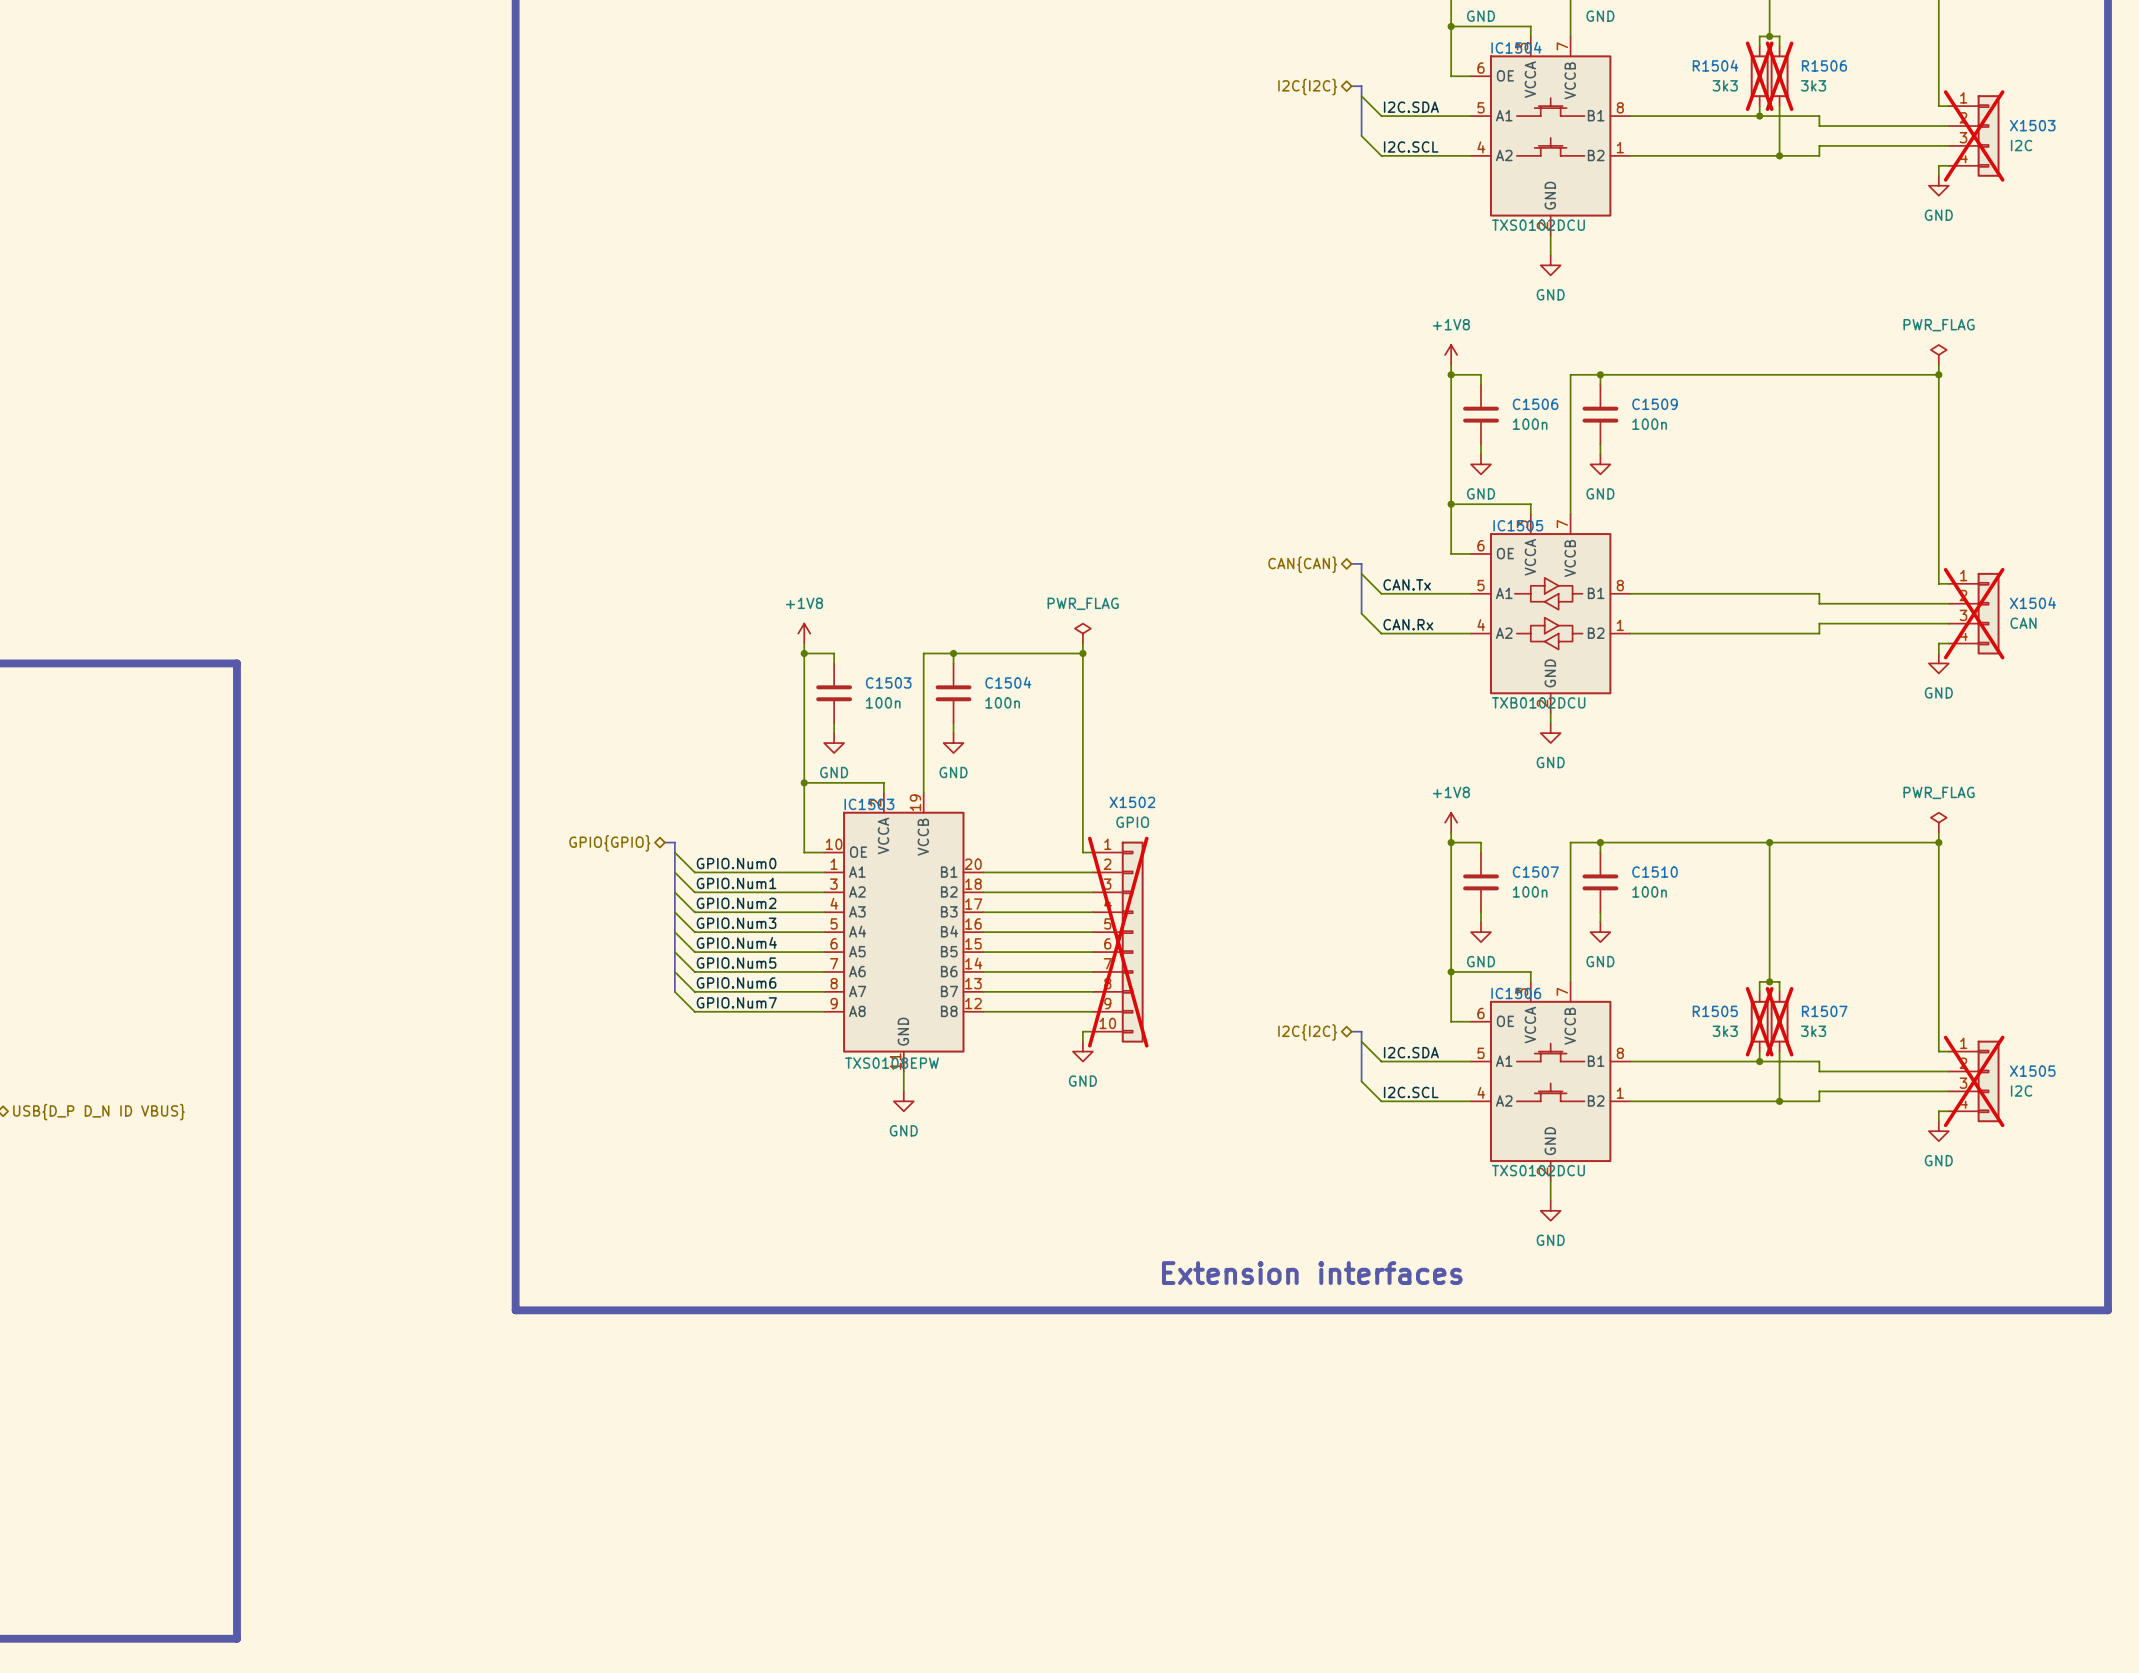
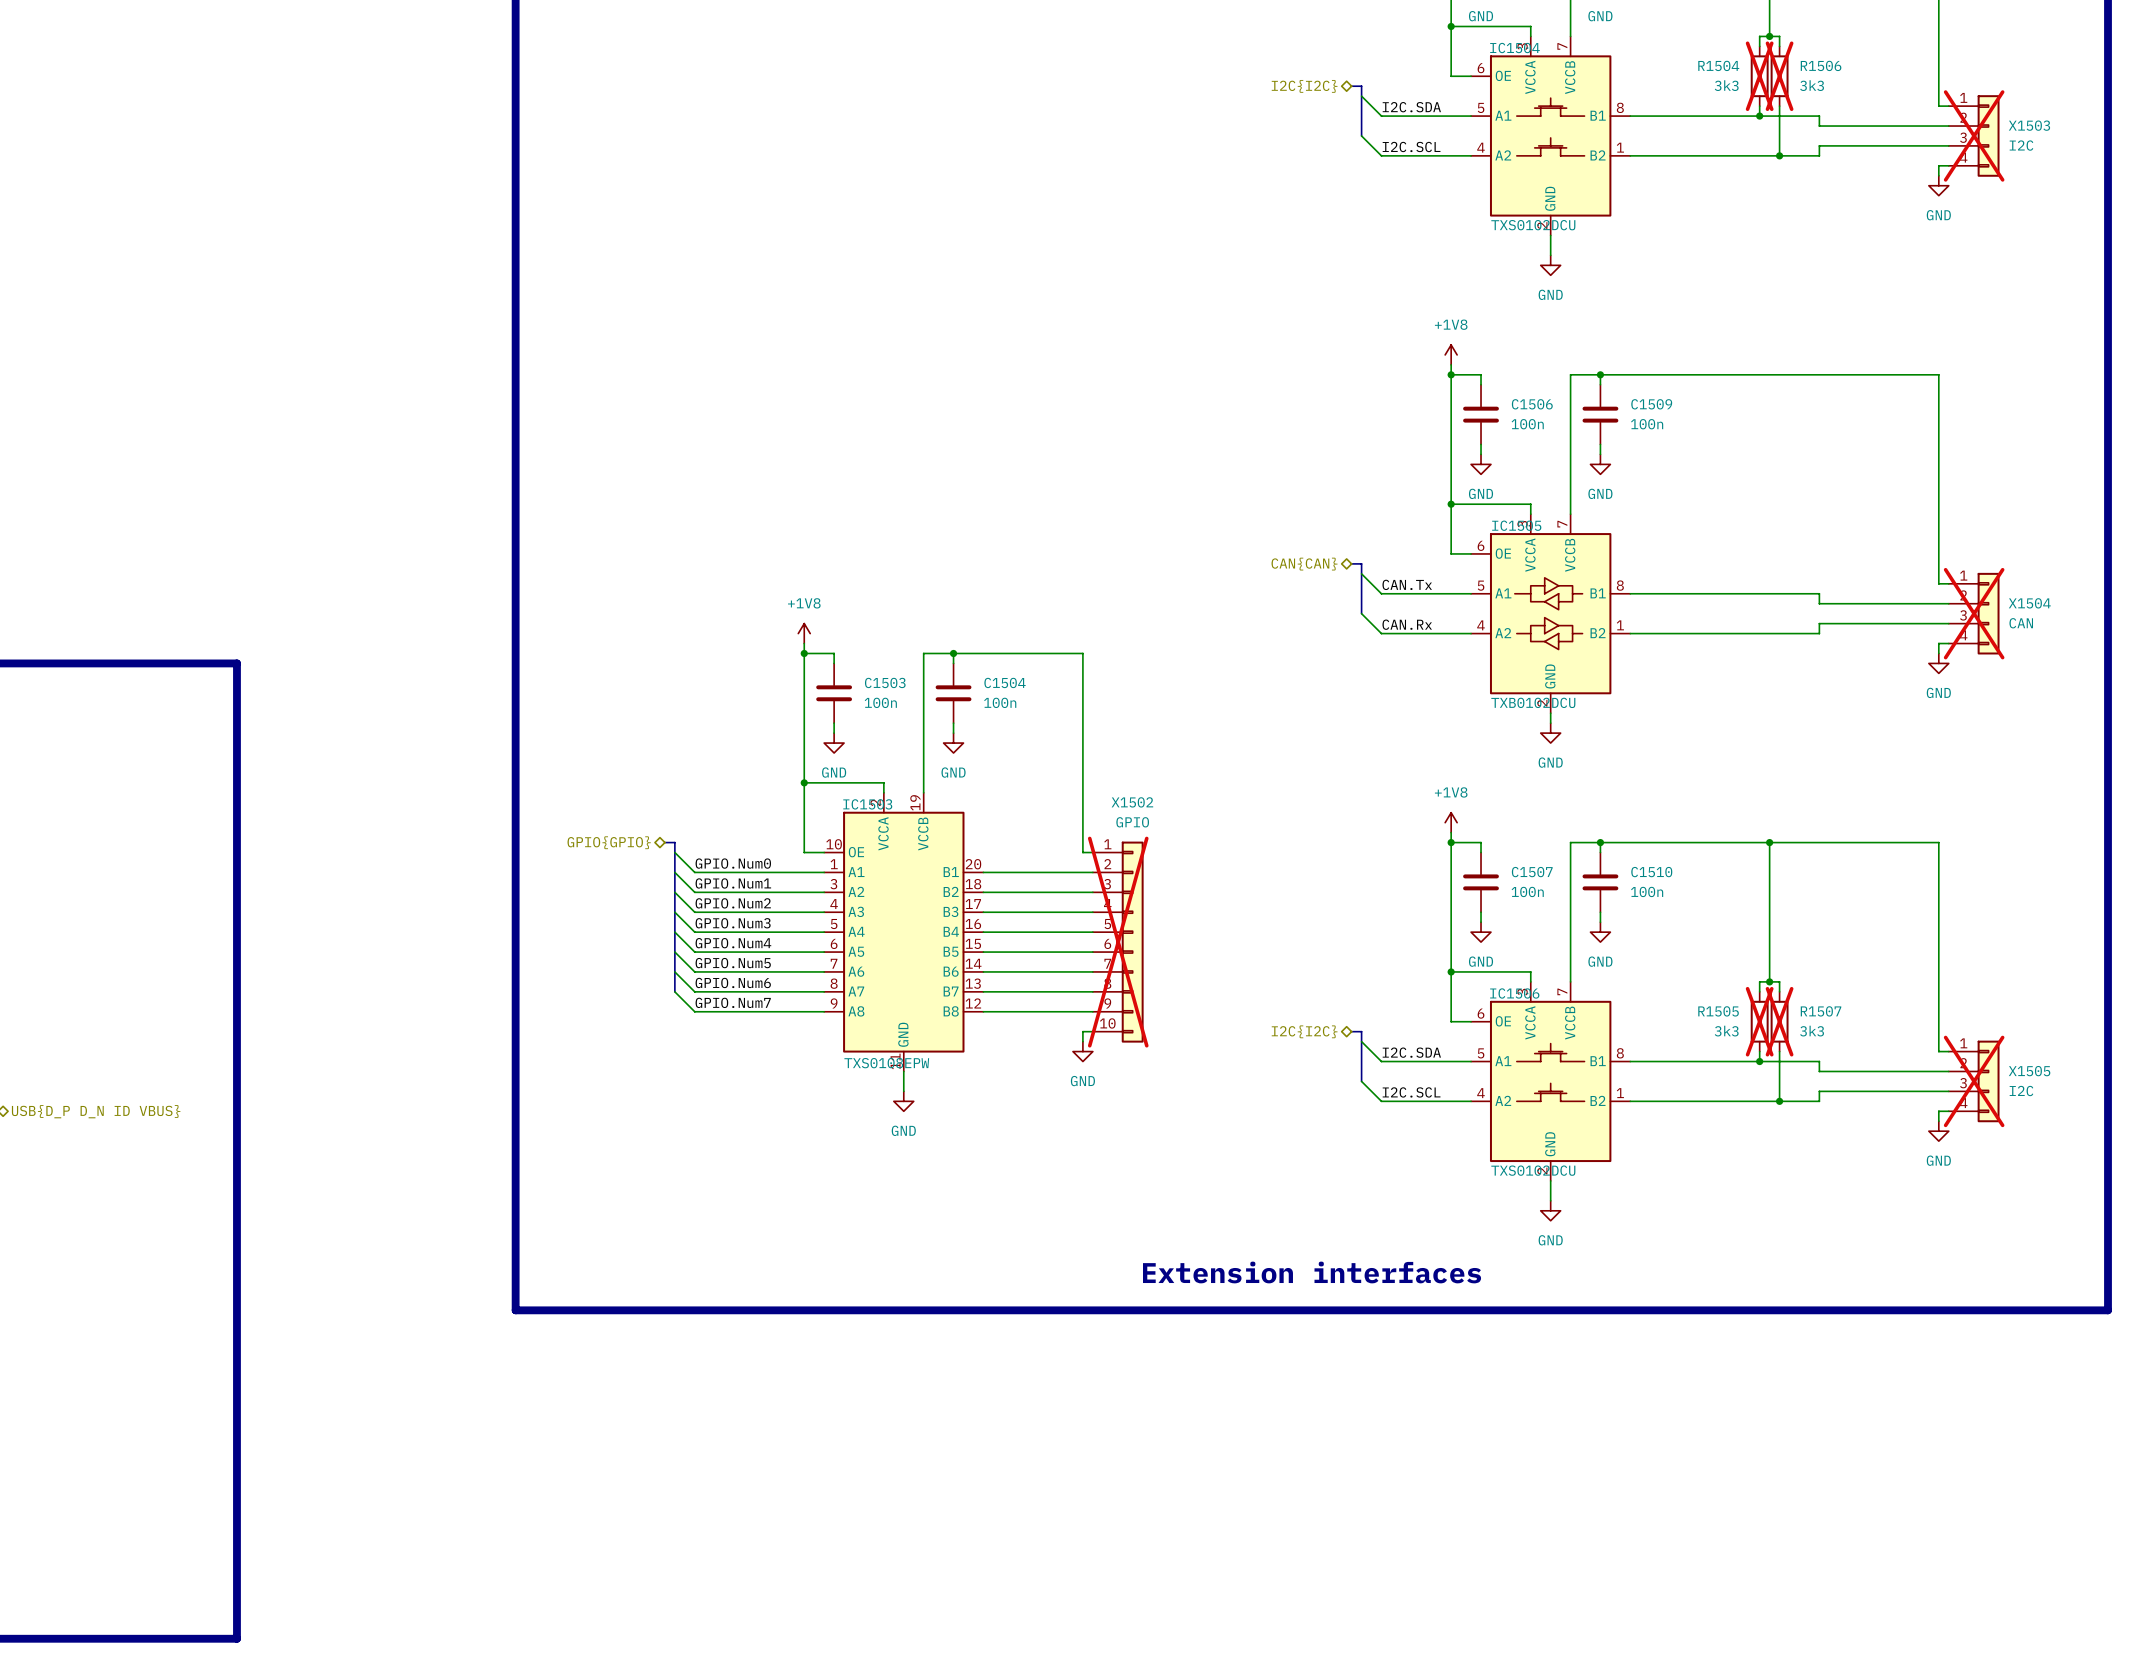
power symbol: PWR_FLAG (1938, 354) -> none
wire: (1938, 364) (1938, 374) -> none
junction: (1938, 374) -> none
power symbol: PWR_FLAG (1082, 633) -> none
wire: (1082, 643) (1082, 653) -> none
junction: (1082, 653) -> none
power symbol: PWR_FLAG (1938, 822) -> none
wire: (1938, 832) (1938, 842) -> none
junction: (1938, 842) -> none

